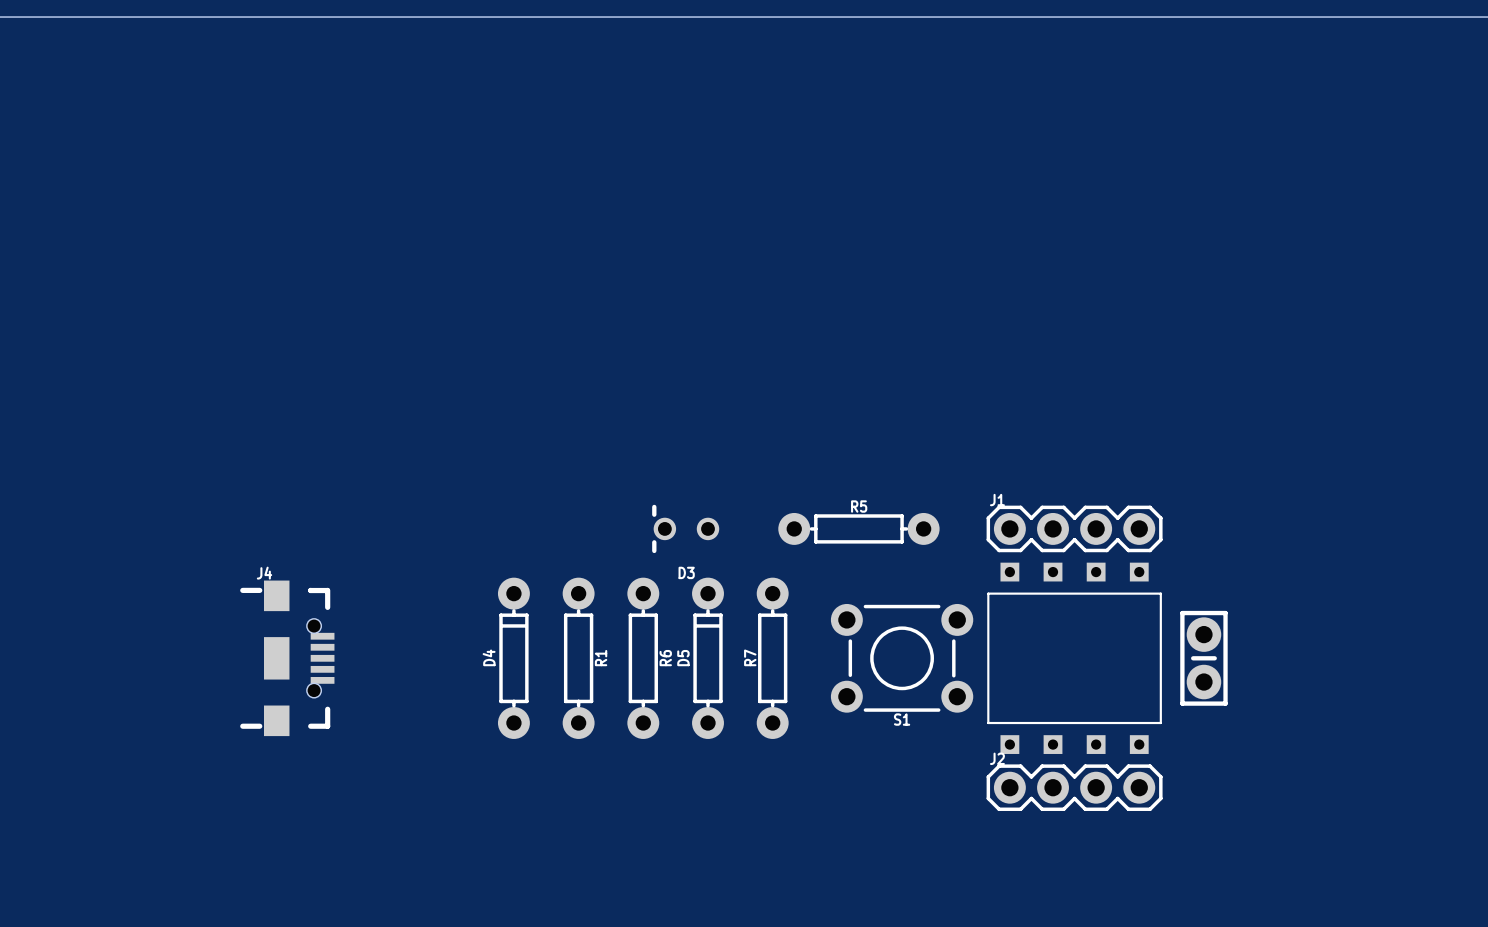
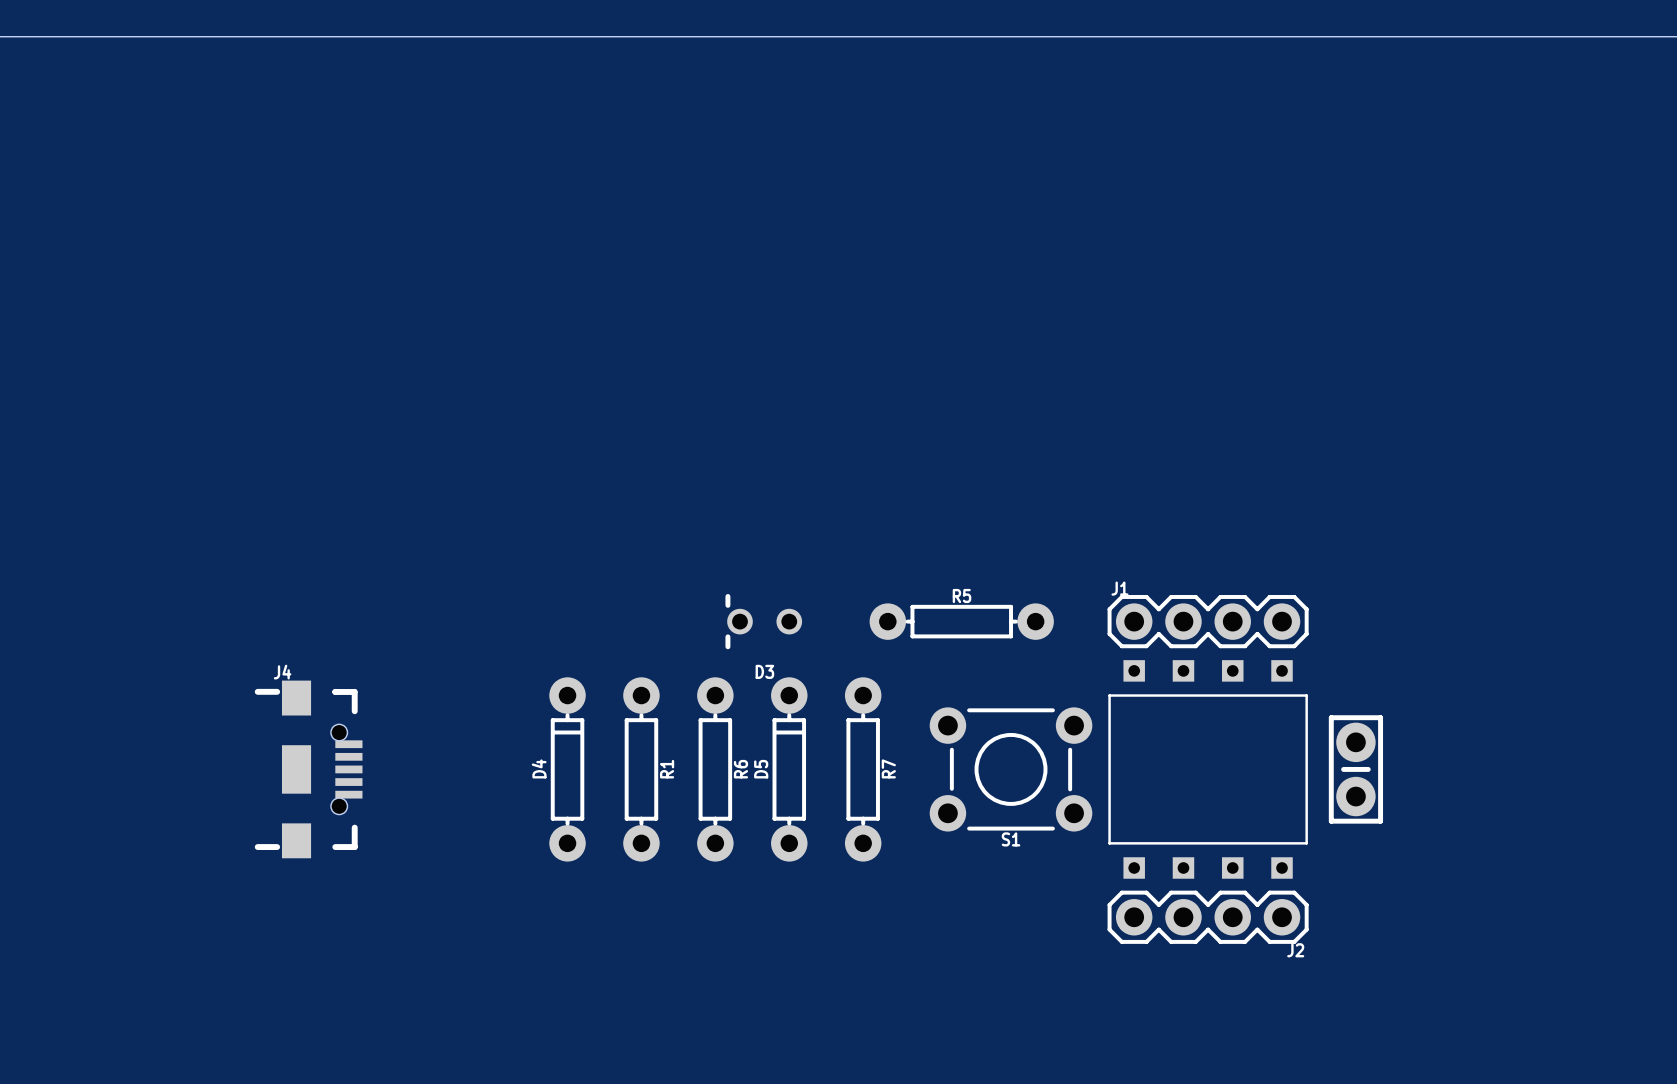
R7 name position: R7 (750, 657) -> R7 (888, 768)
J2 name position: J2 (997, 758) -> J2 (1295, 950)

